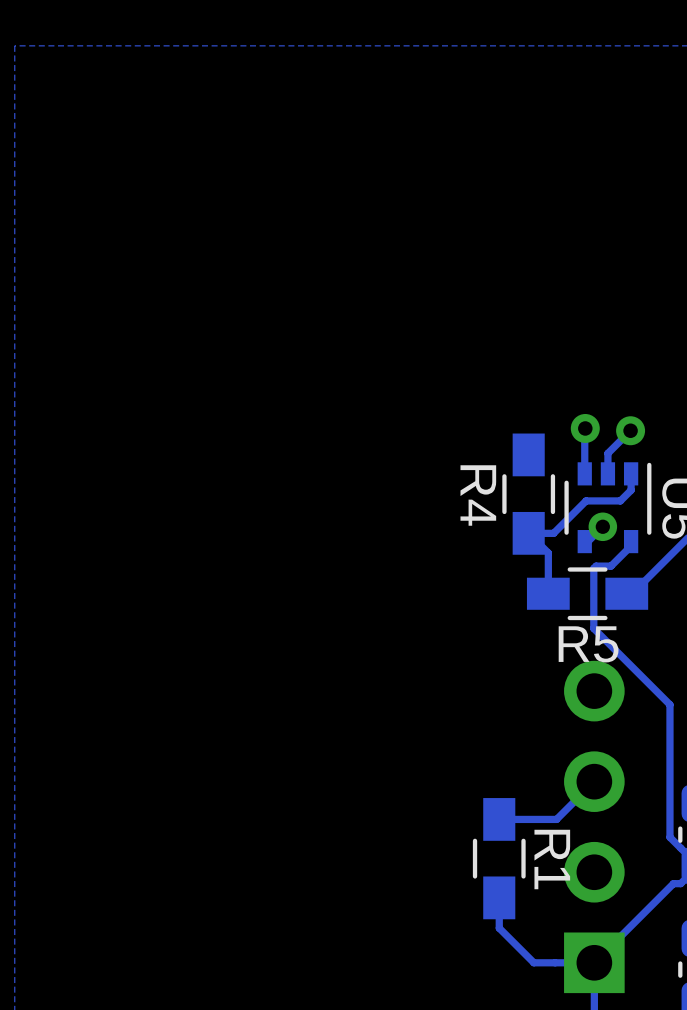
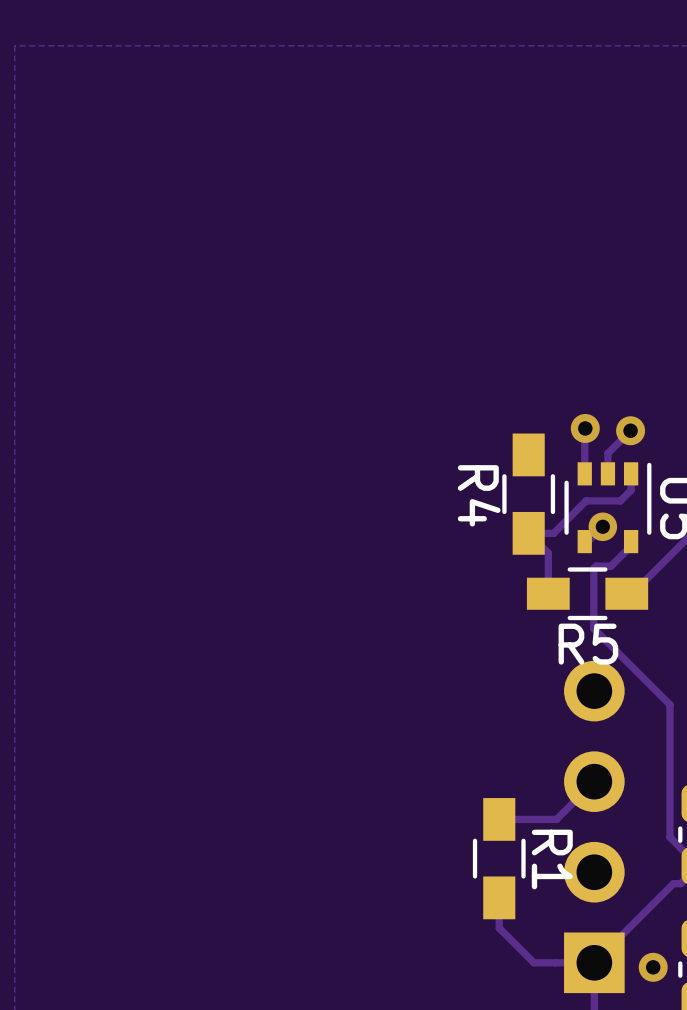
via: none -> (653, 967)

